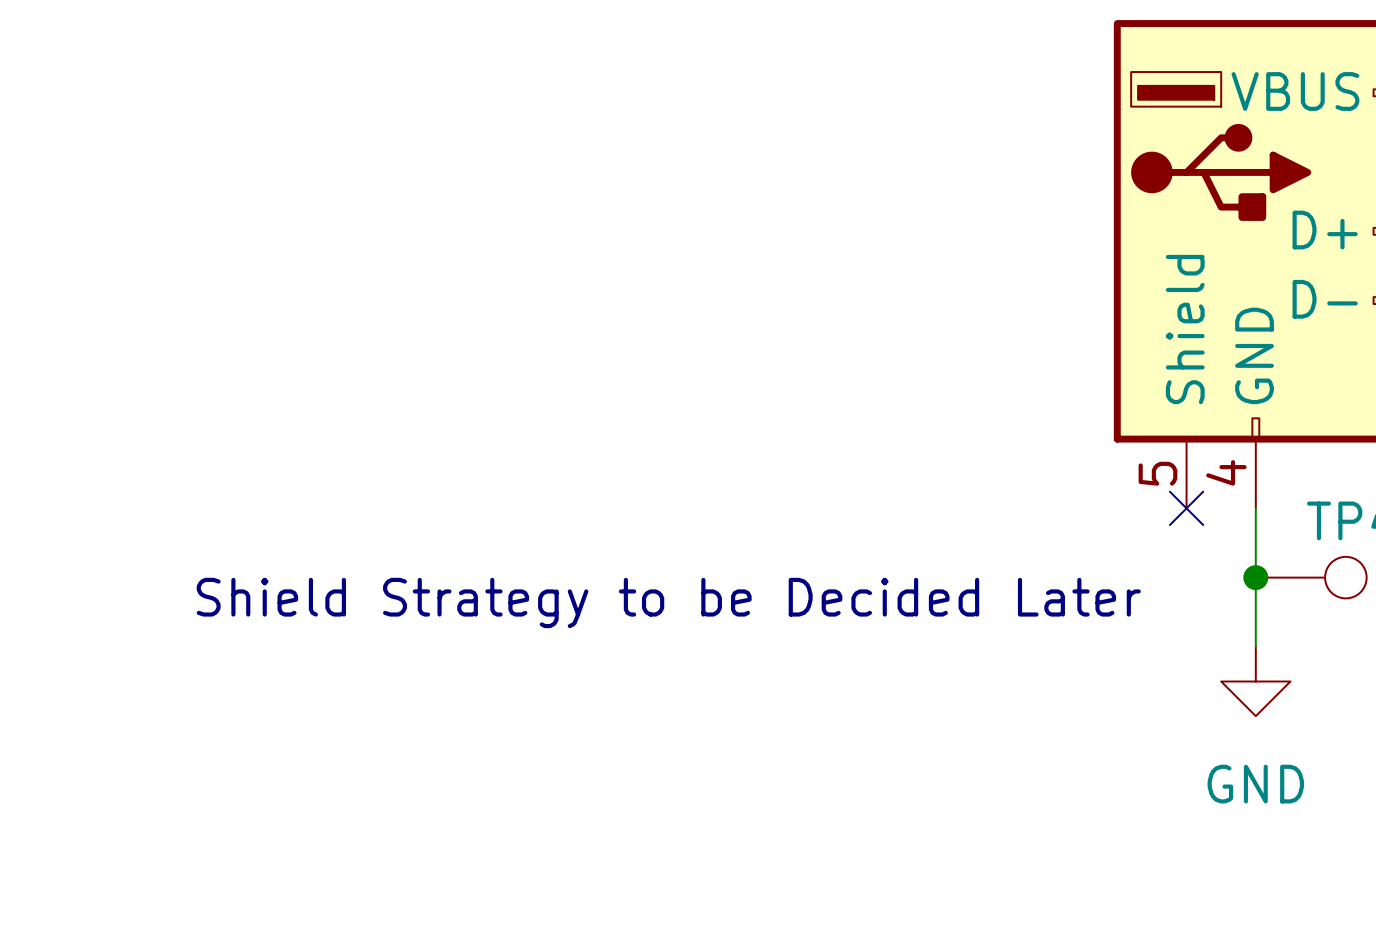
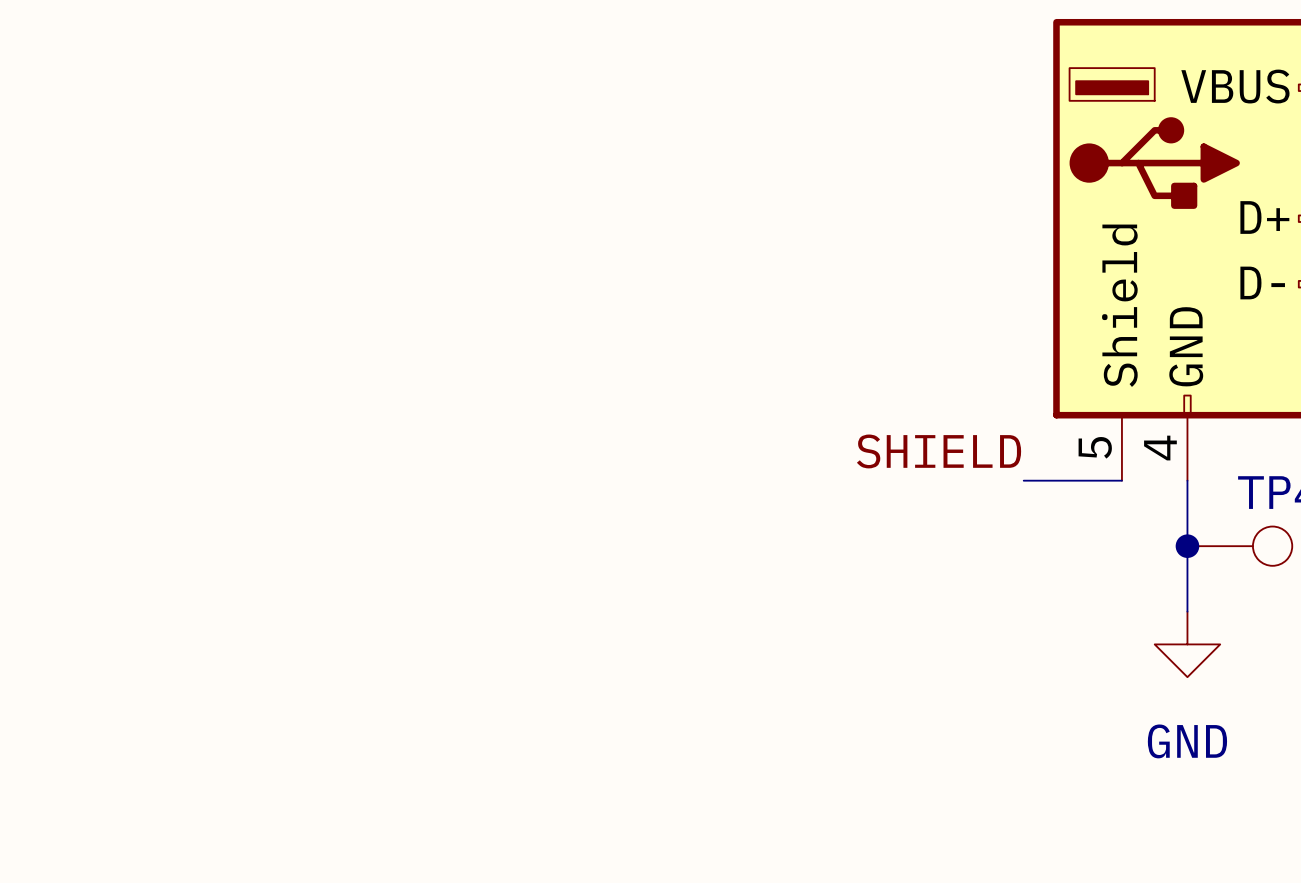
label: none -> SHIELD (939, 451)
wire: none -> (1023, 480) (1121, 480)
no-connect mark: (1186, 508) -> none
text: Shield Strategy to be Decided Later (668, 602) -> none

